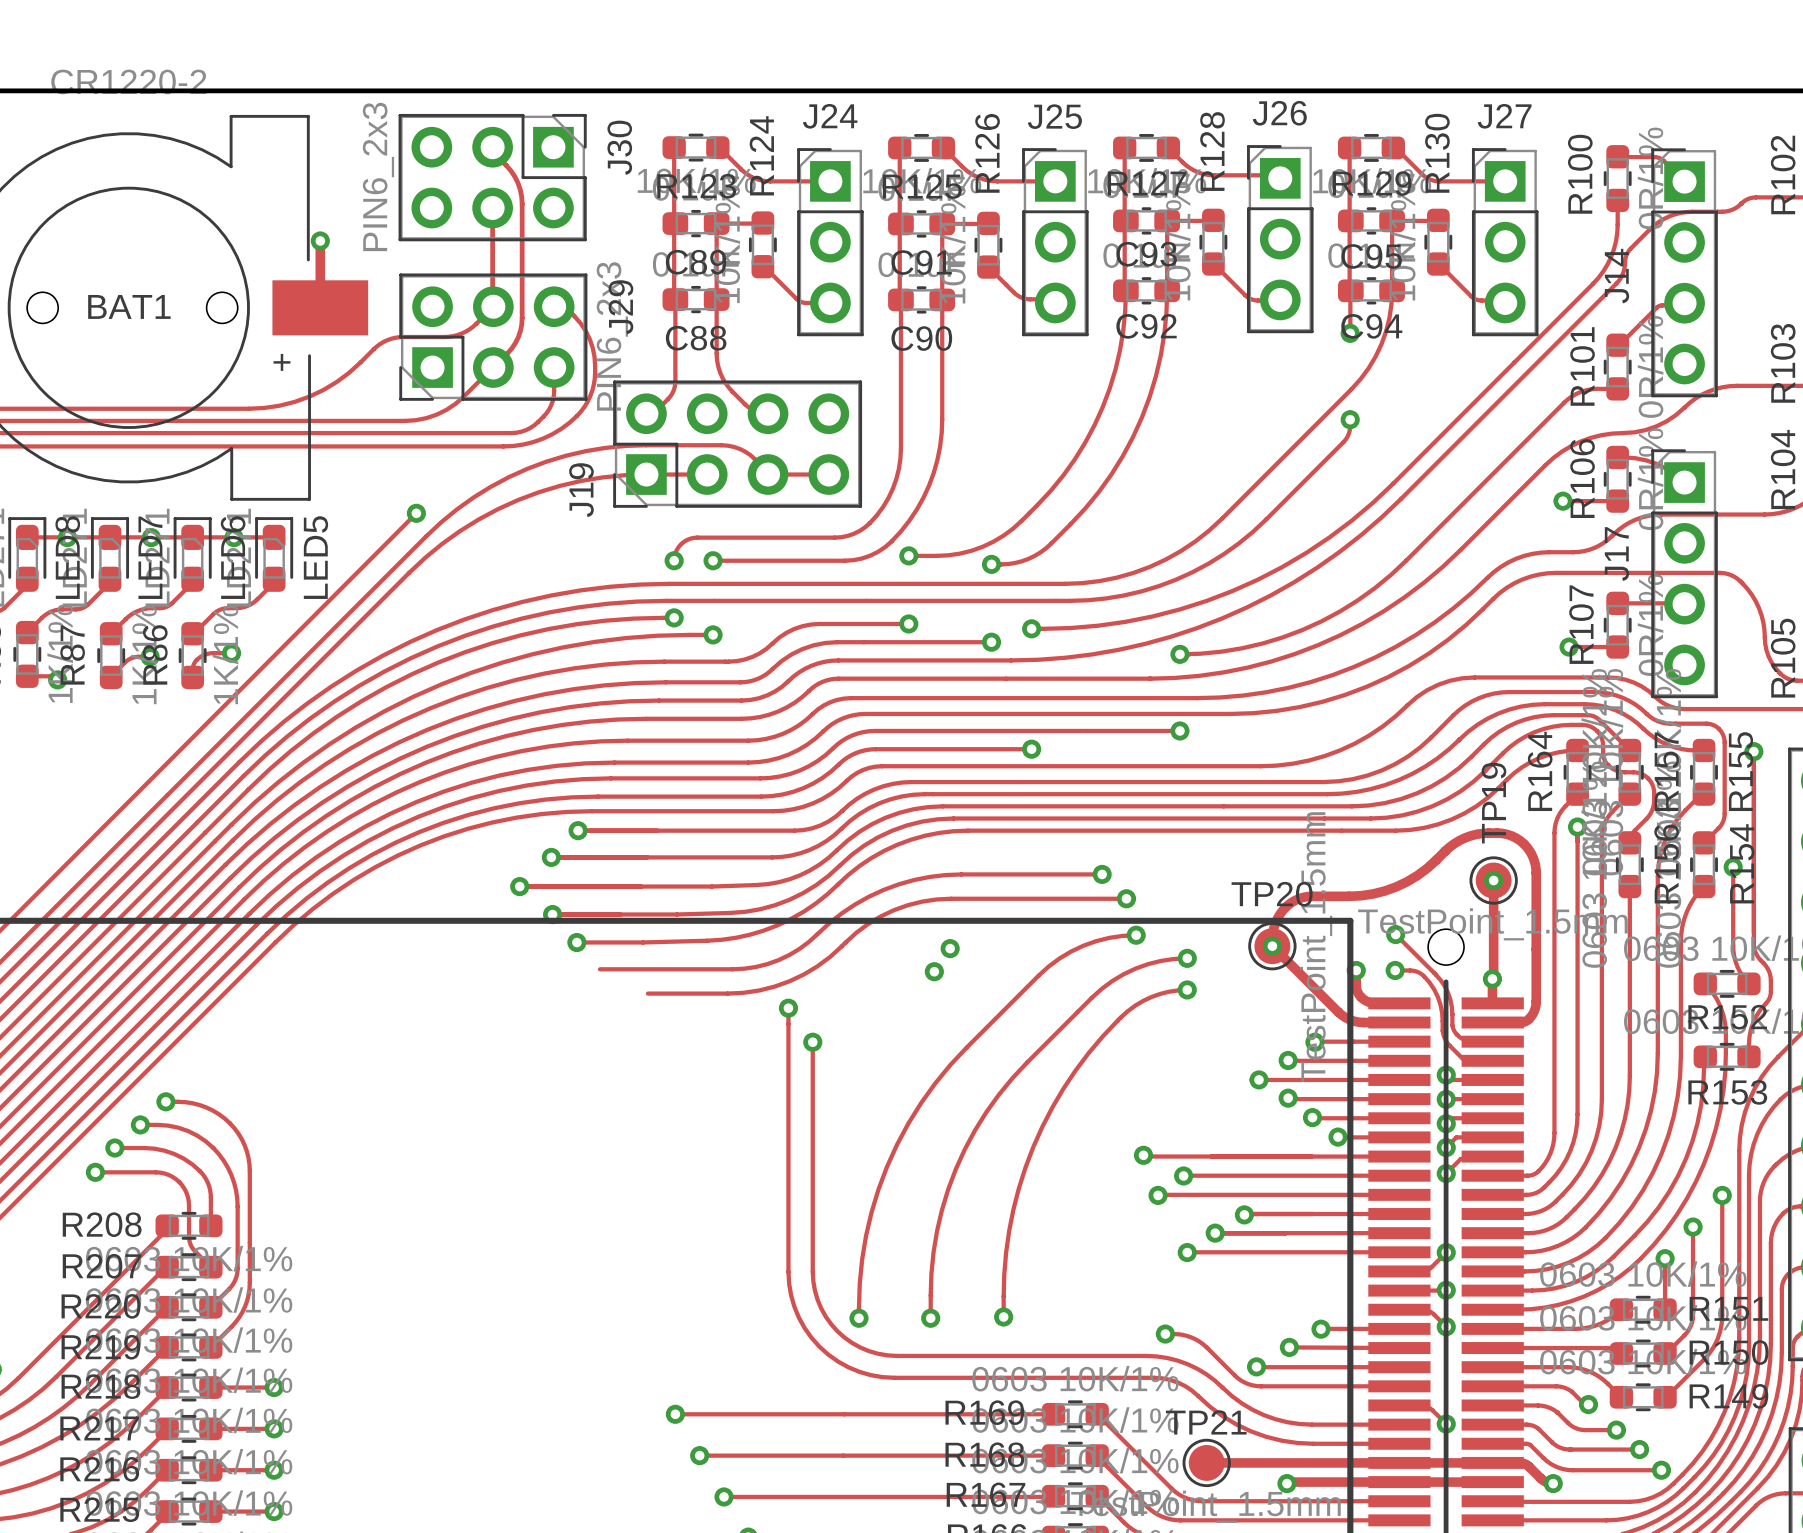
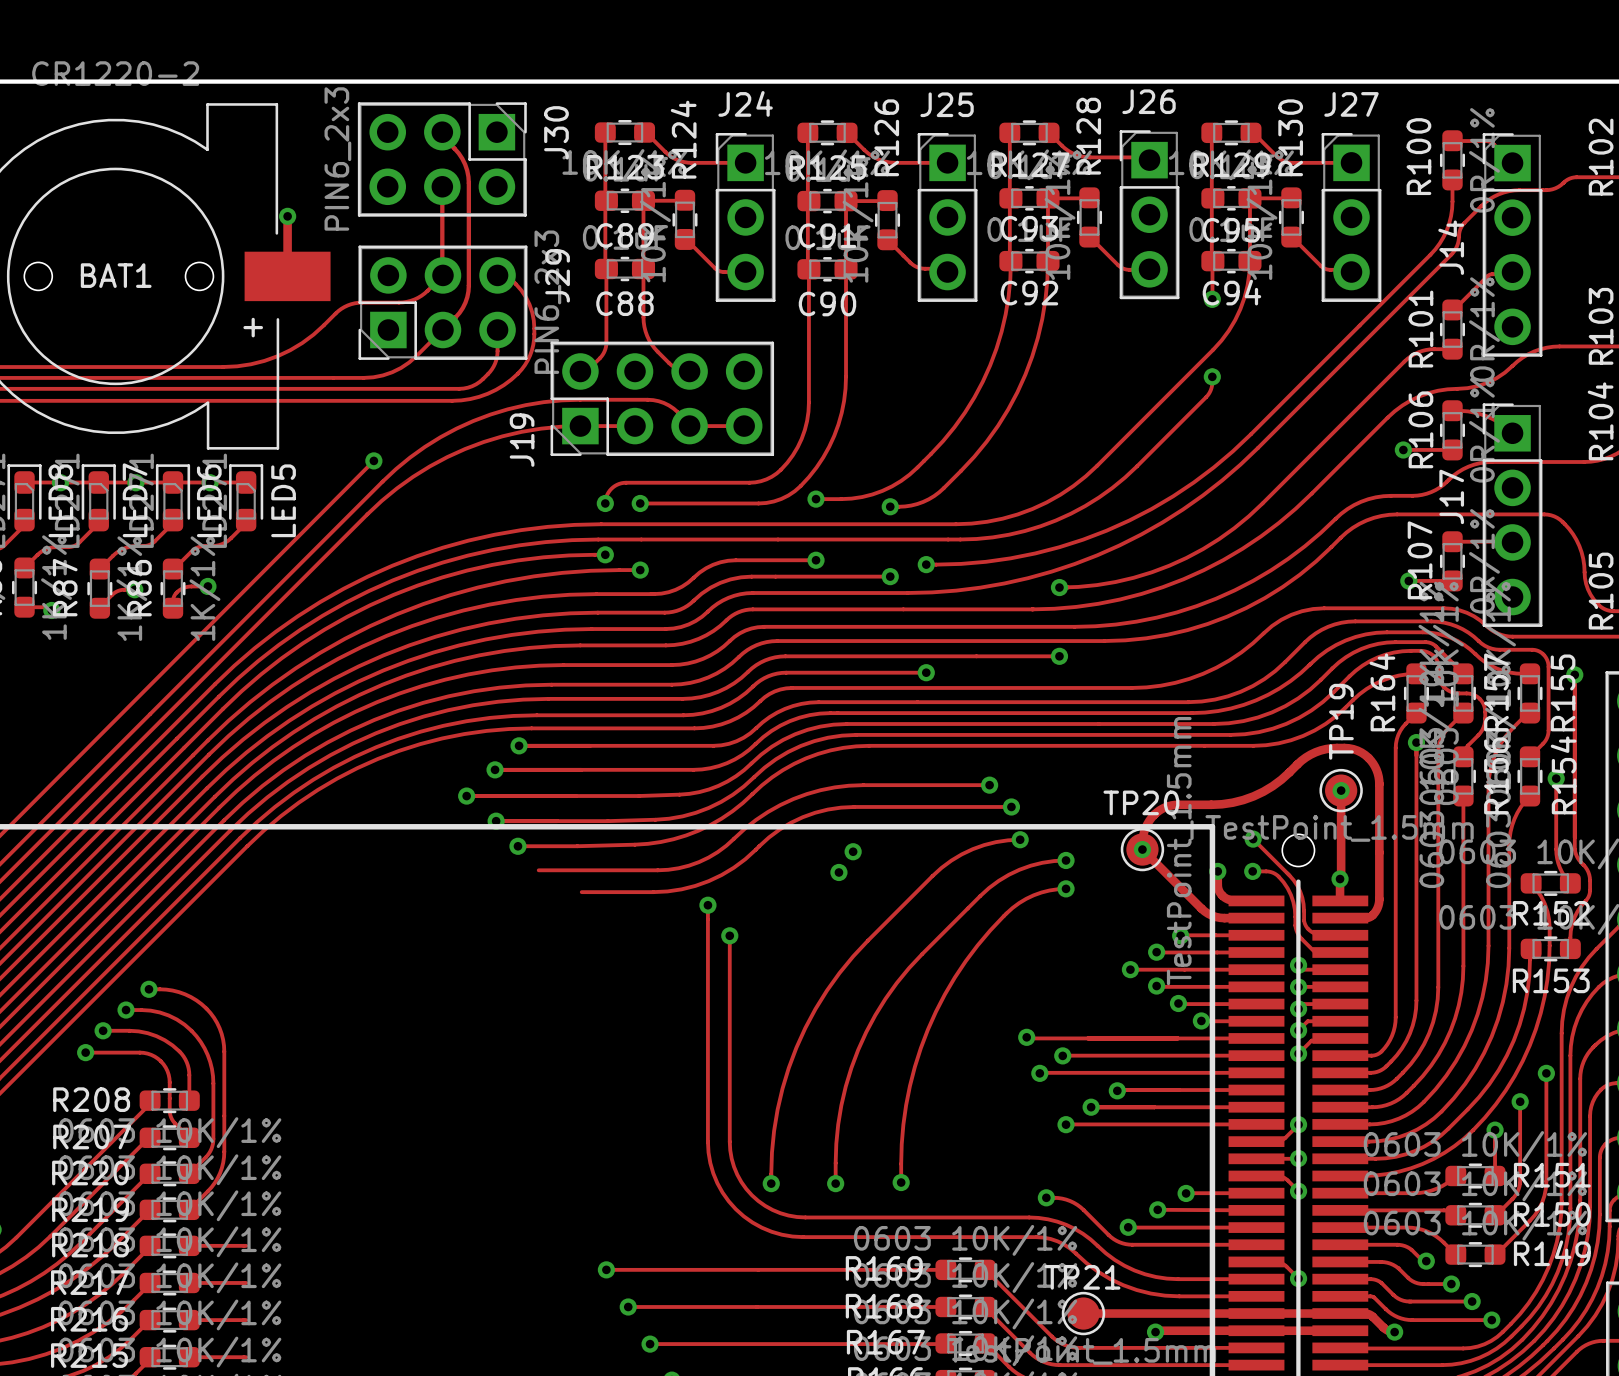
via: (274, 1387) -> none
via: (274, 1428) -> none
via: (274, 1470) -> none
via: (274, 1511) -> none

